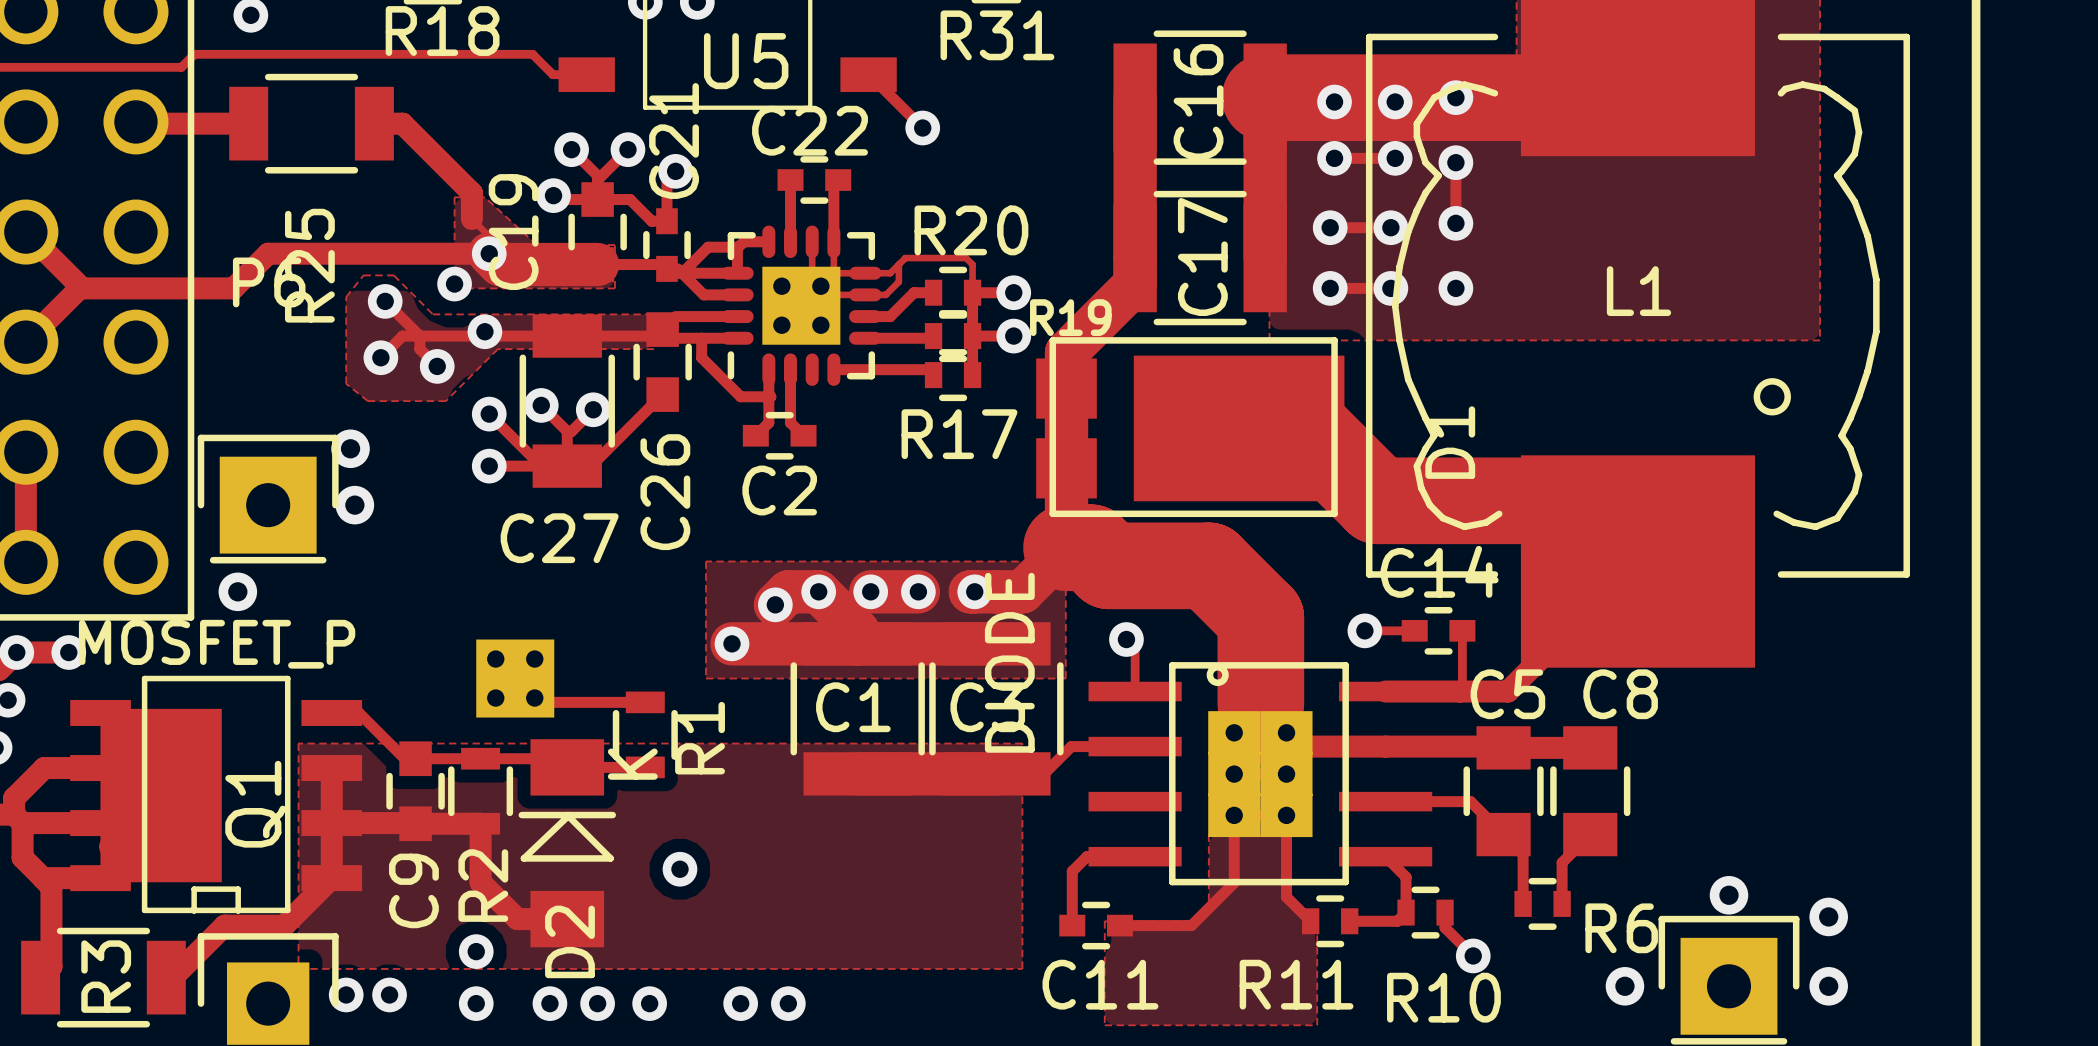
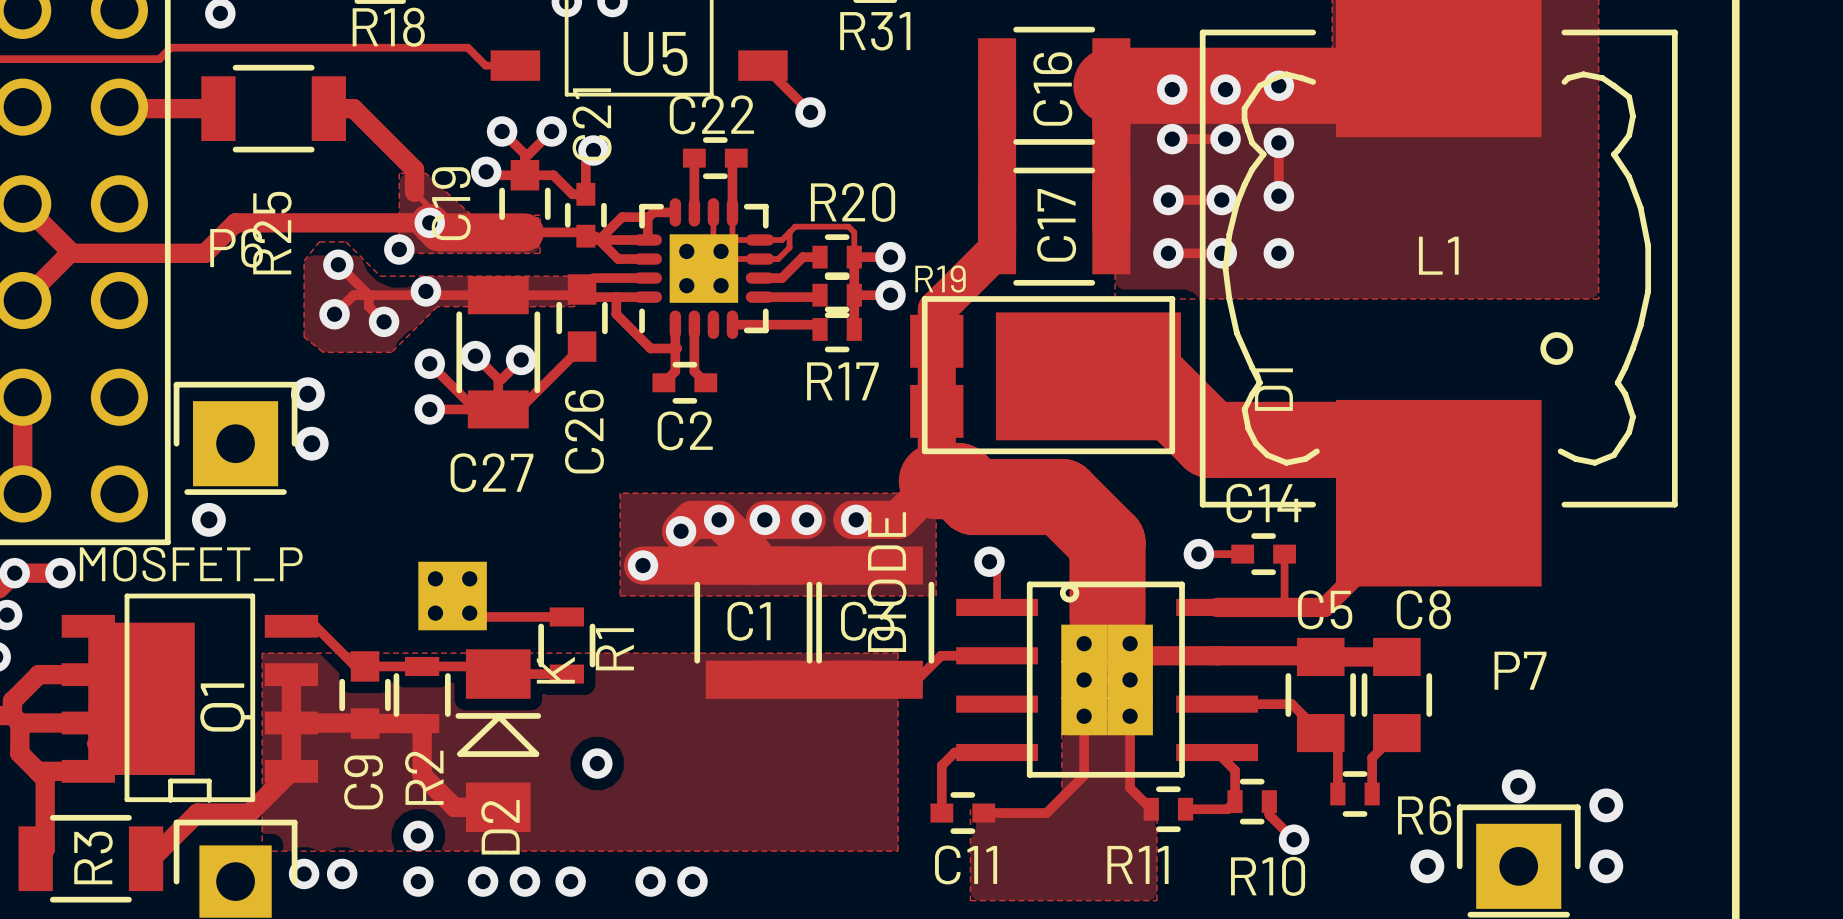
P7 name: none -> P7 (1520, 670)

